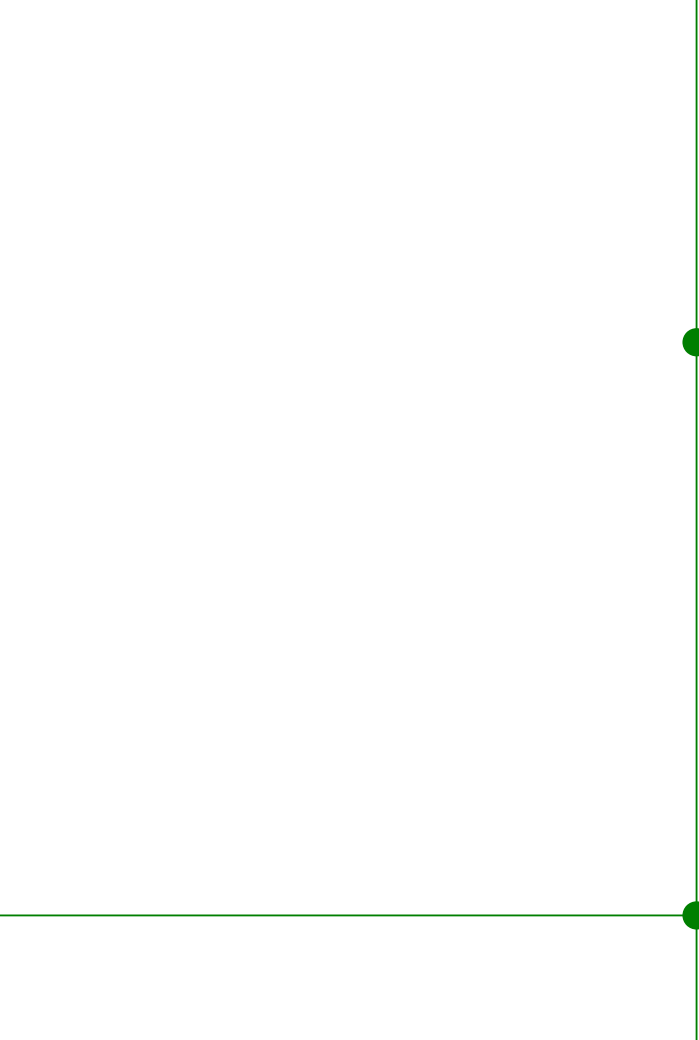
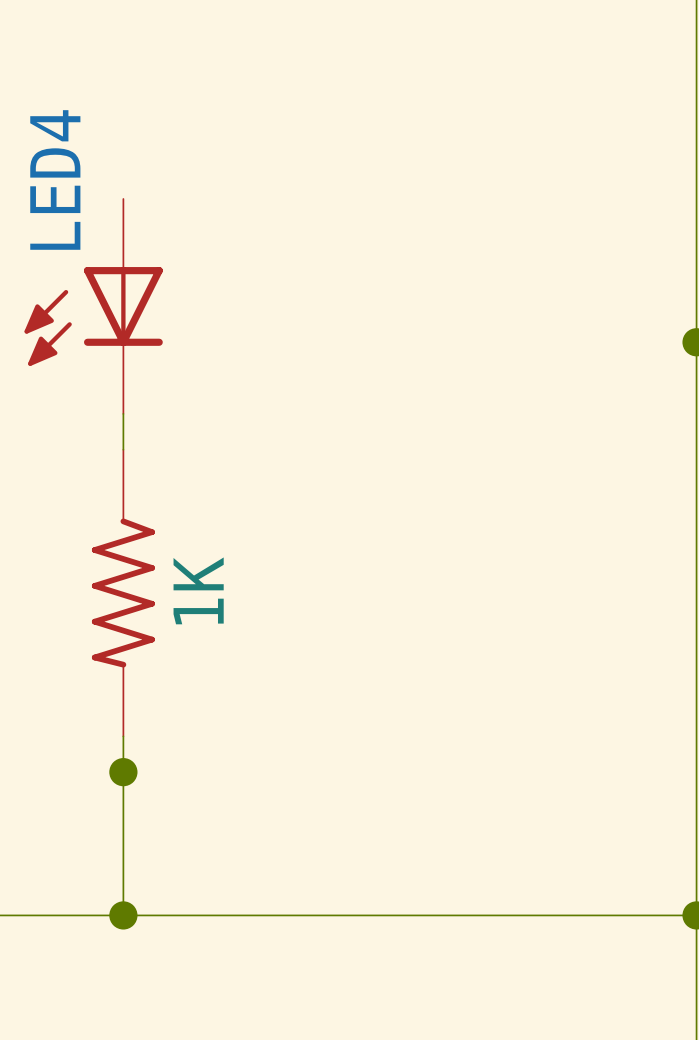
LED4: none -> (93, 306)
wire: none -> (123, 413) (123, 449)
part: none -> 1K (123, 593)
wire: none -> (123, 736) (123, 915)
junction: none -> (123, 772)
junction: none -> (123, 915)

